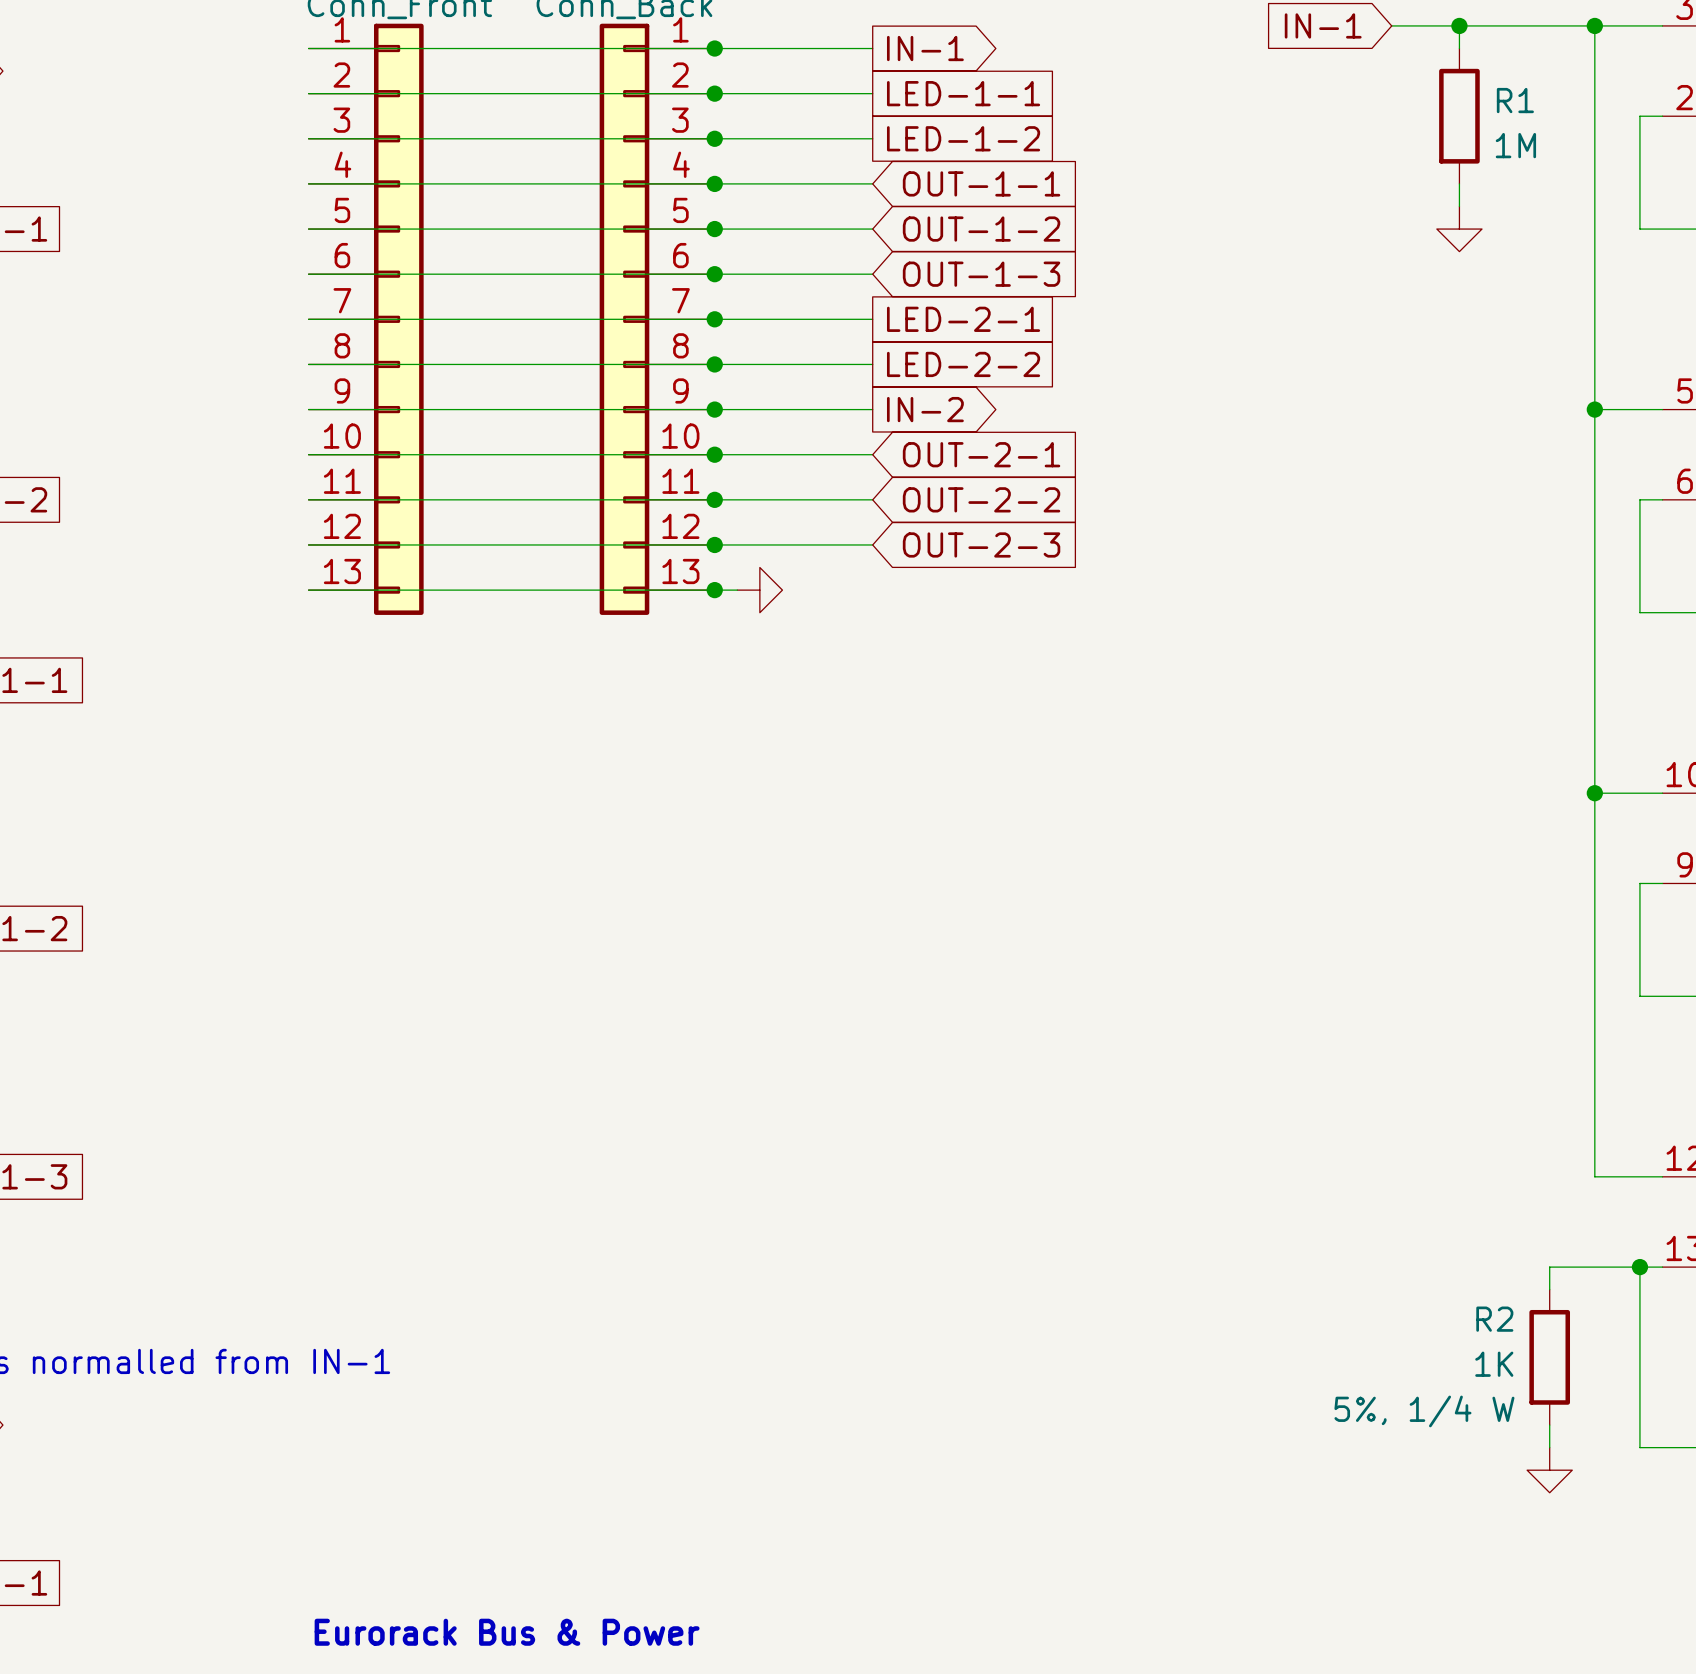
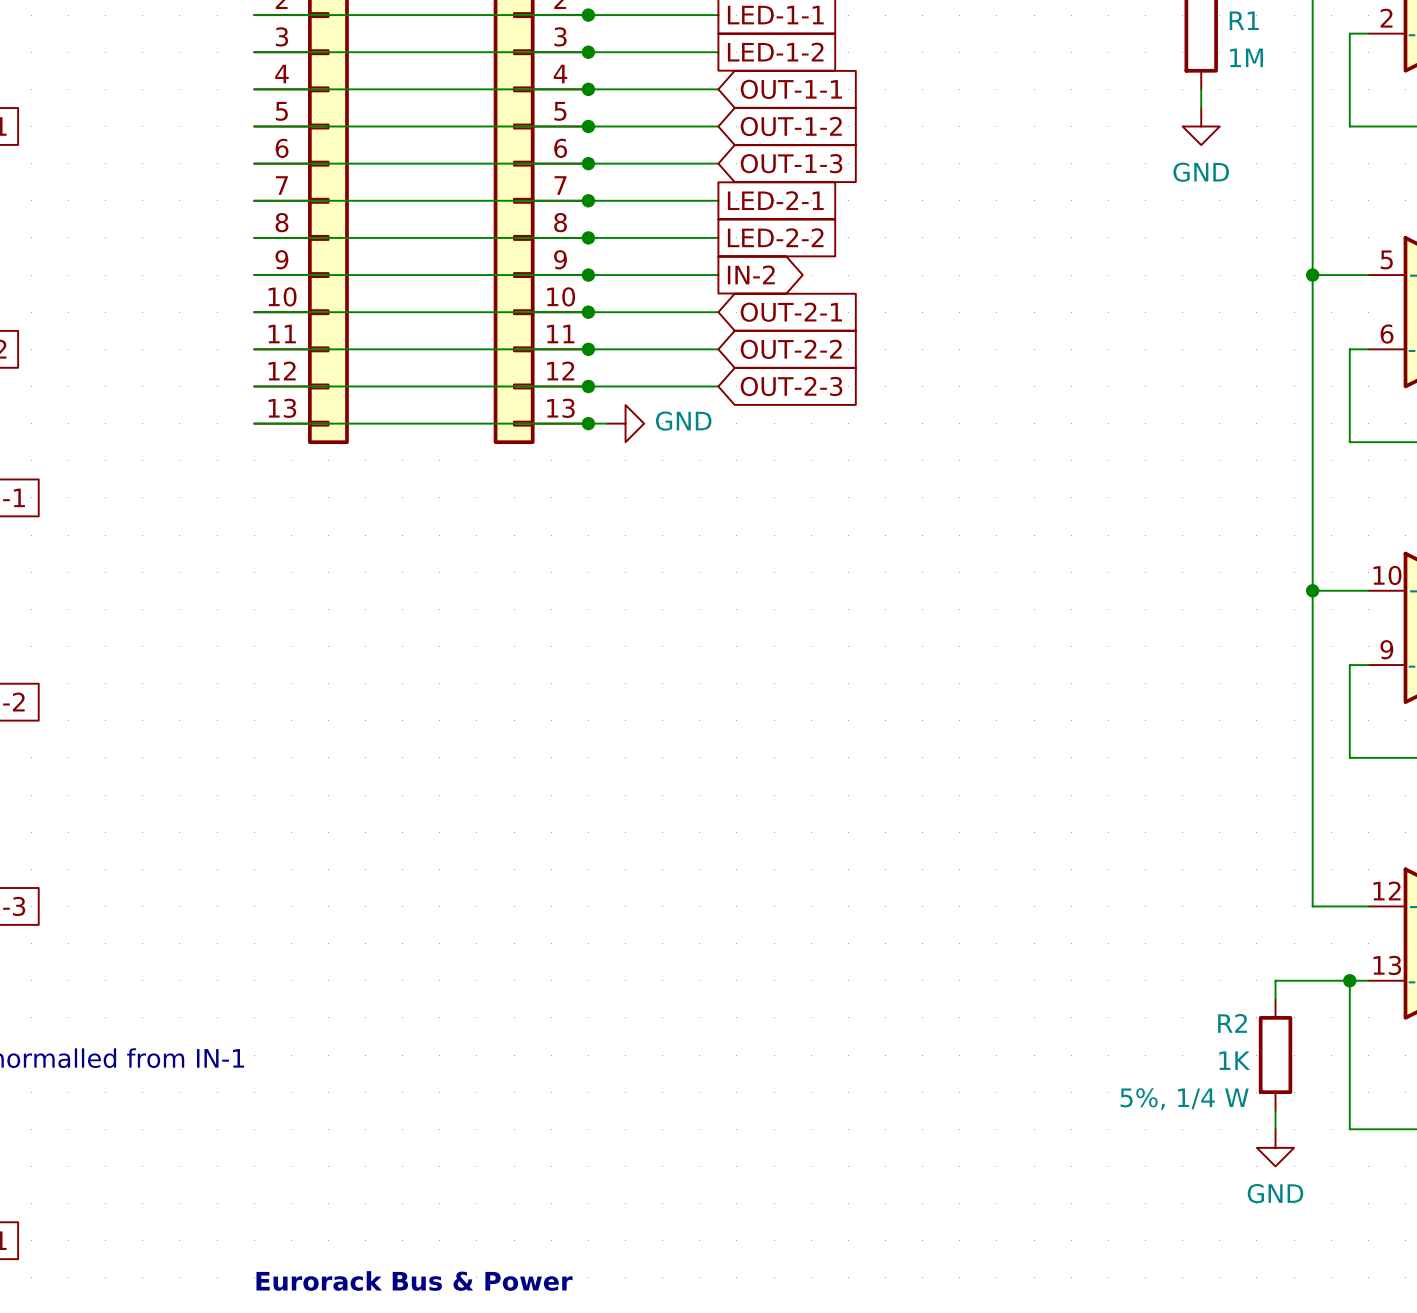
power symbol text: none -> GND (1201, 172)
power symbol text: none -> GND (683, 421)
power symbol text: none -> GND (1275, 1193)

